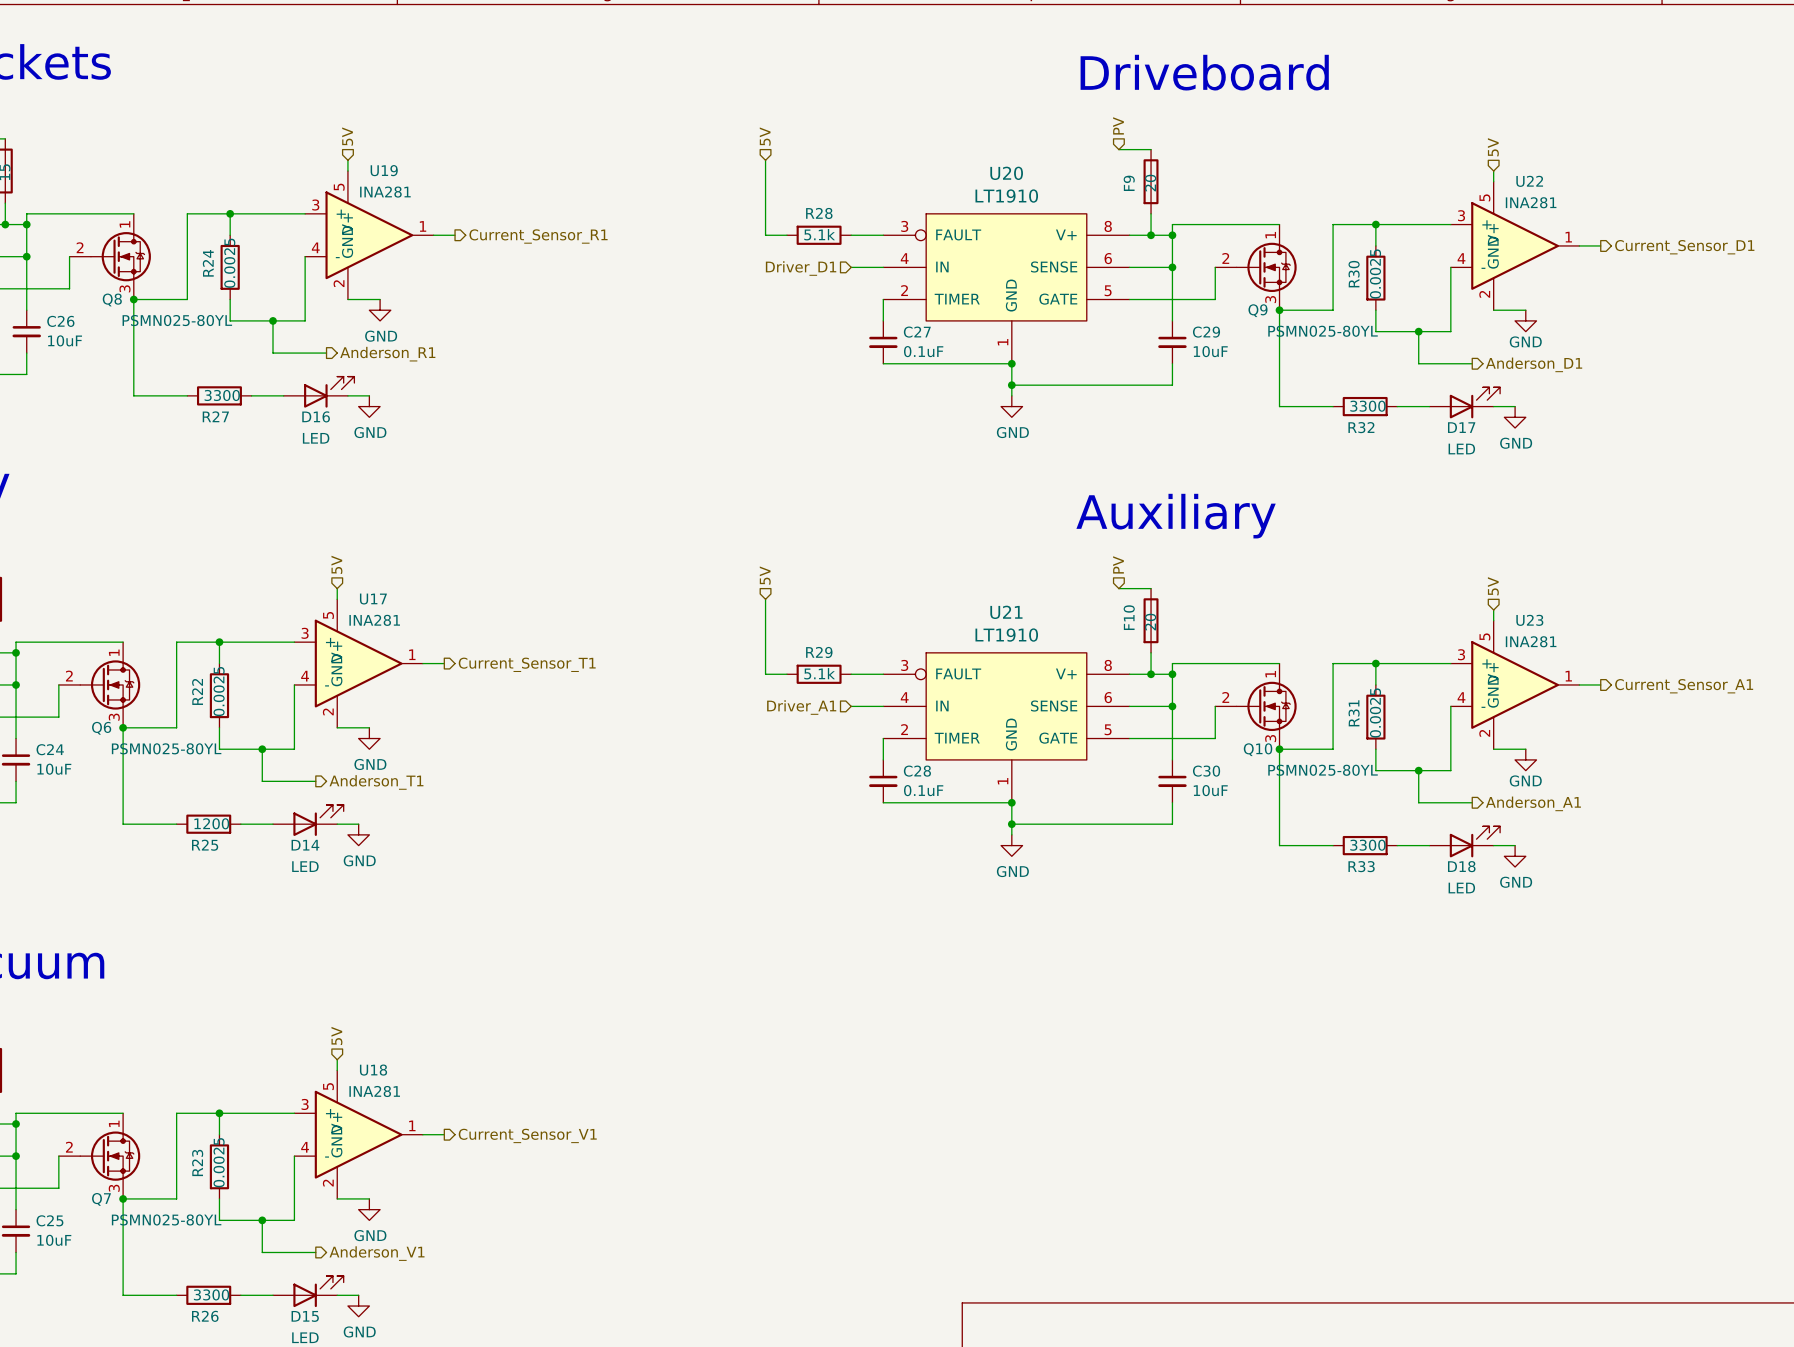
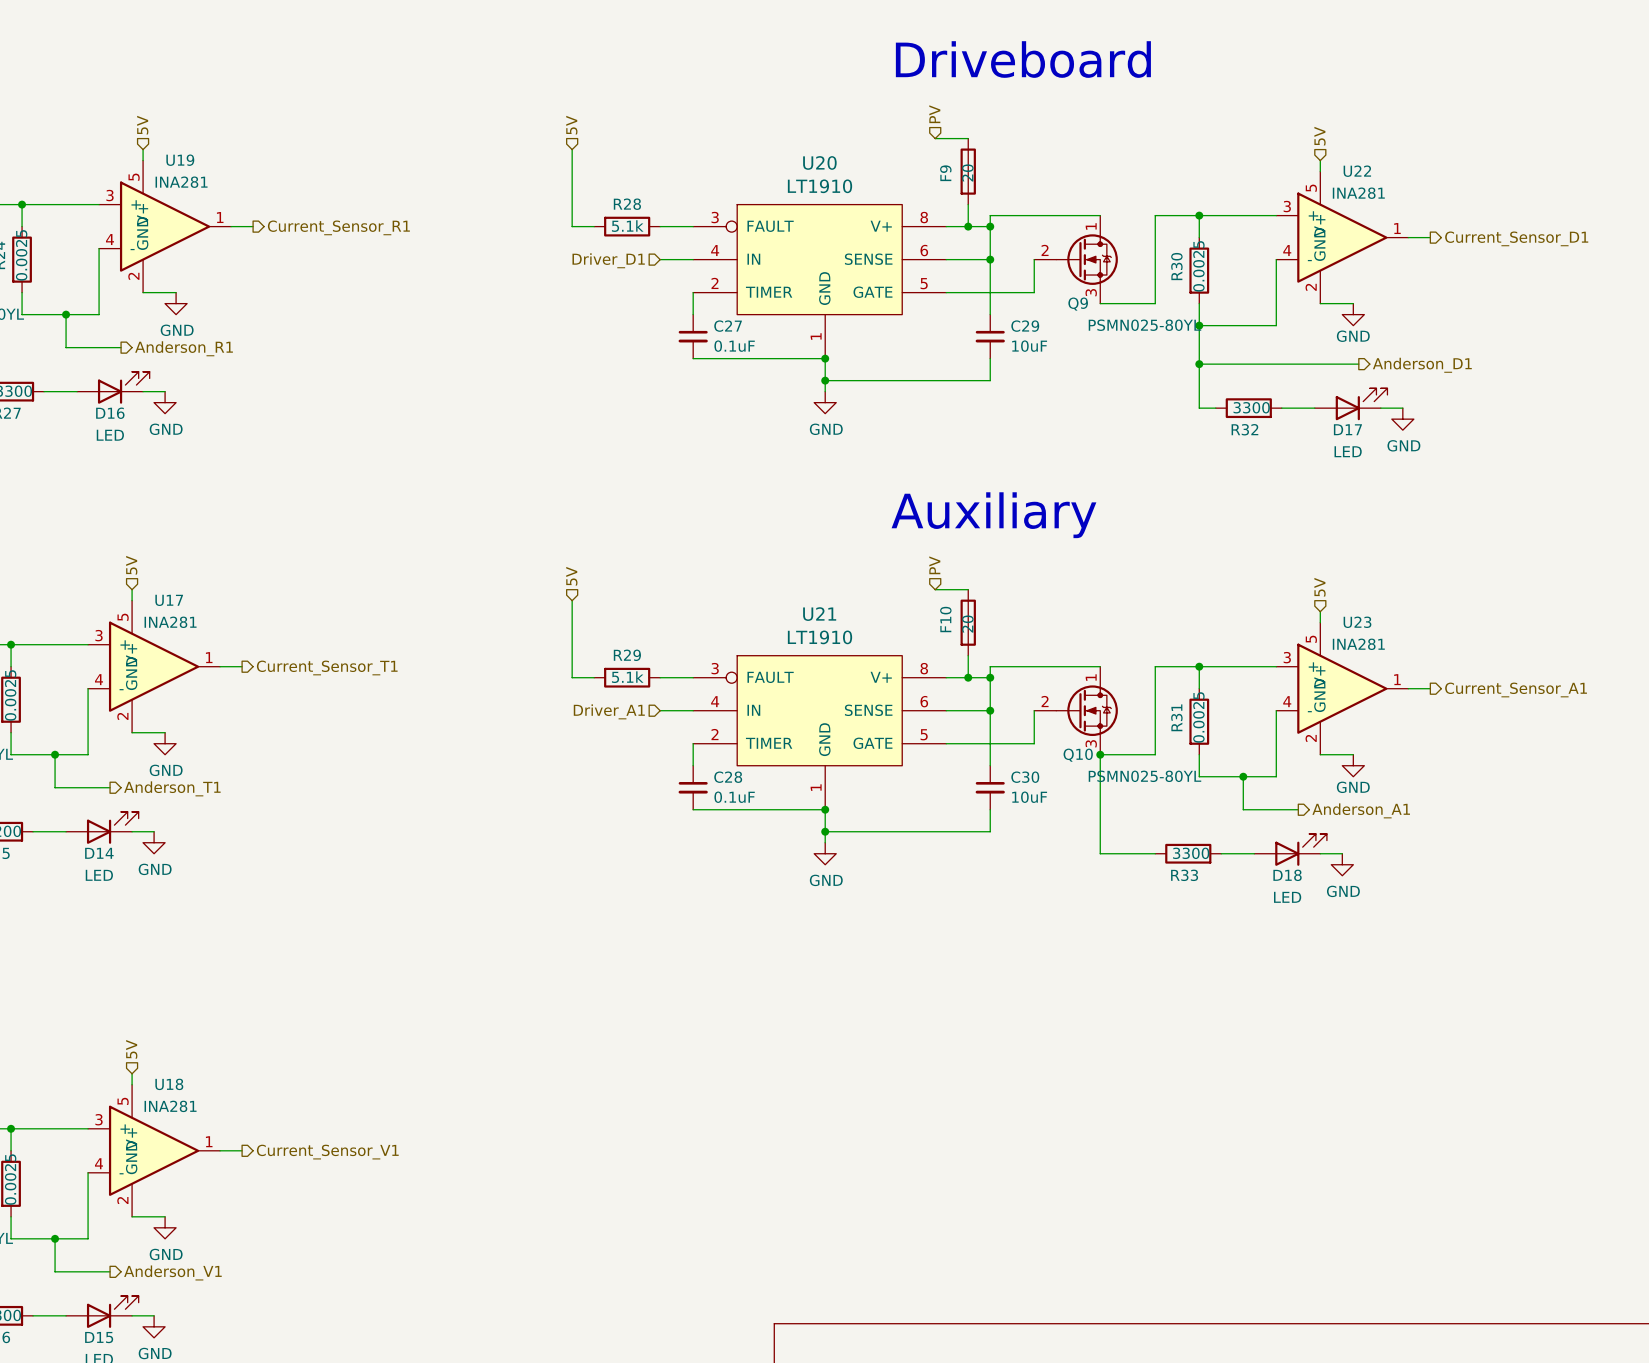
wire: (1279, 310) (1279, 406) (1333, 406) -> none
junction: (1279, 310) -> none
wire: none -> (1199, 325) (1199, 408) (1215, 408)
junction: none -> (1199, 325)
wire: (1418, 331) (1418, 363) (1472, 363) -> none
junction: (1418, 331) -> none
hierarchical label position: Anderson_D1 (1534, 364) -> Anderson_D1 (1422, 365)
wire: none -> (1199, 364) (1358, 364)
junction: none -> (1199, 364)
D17 position: (1464, 402) -> (1351, 404)
R32 position: (1365, 406) -> (1248, 408)
wire: (1397, 406) (1429, 406) -> (1281, 408) (1314, 408)
wire: (1493, 406) (1515, 406) -> (1380, 408) (1402, 408)
power symbol position: GND (1515, 417) -> GND (1402, 419)

